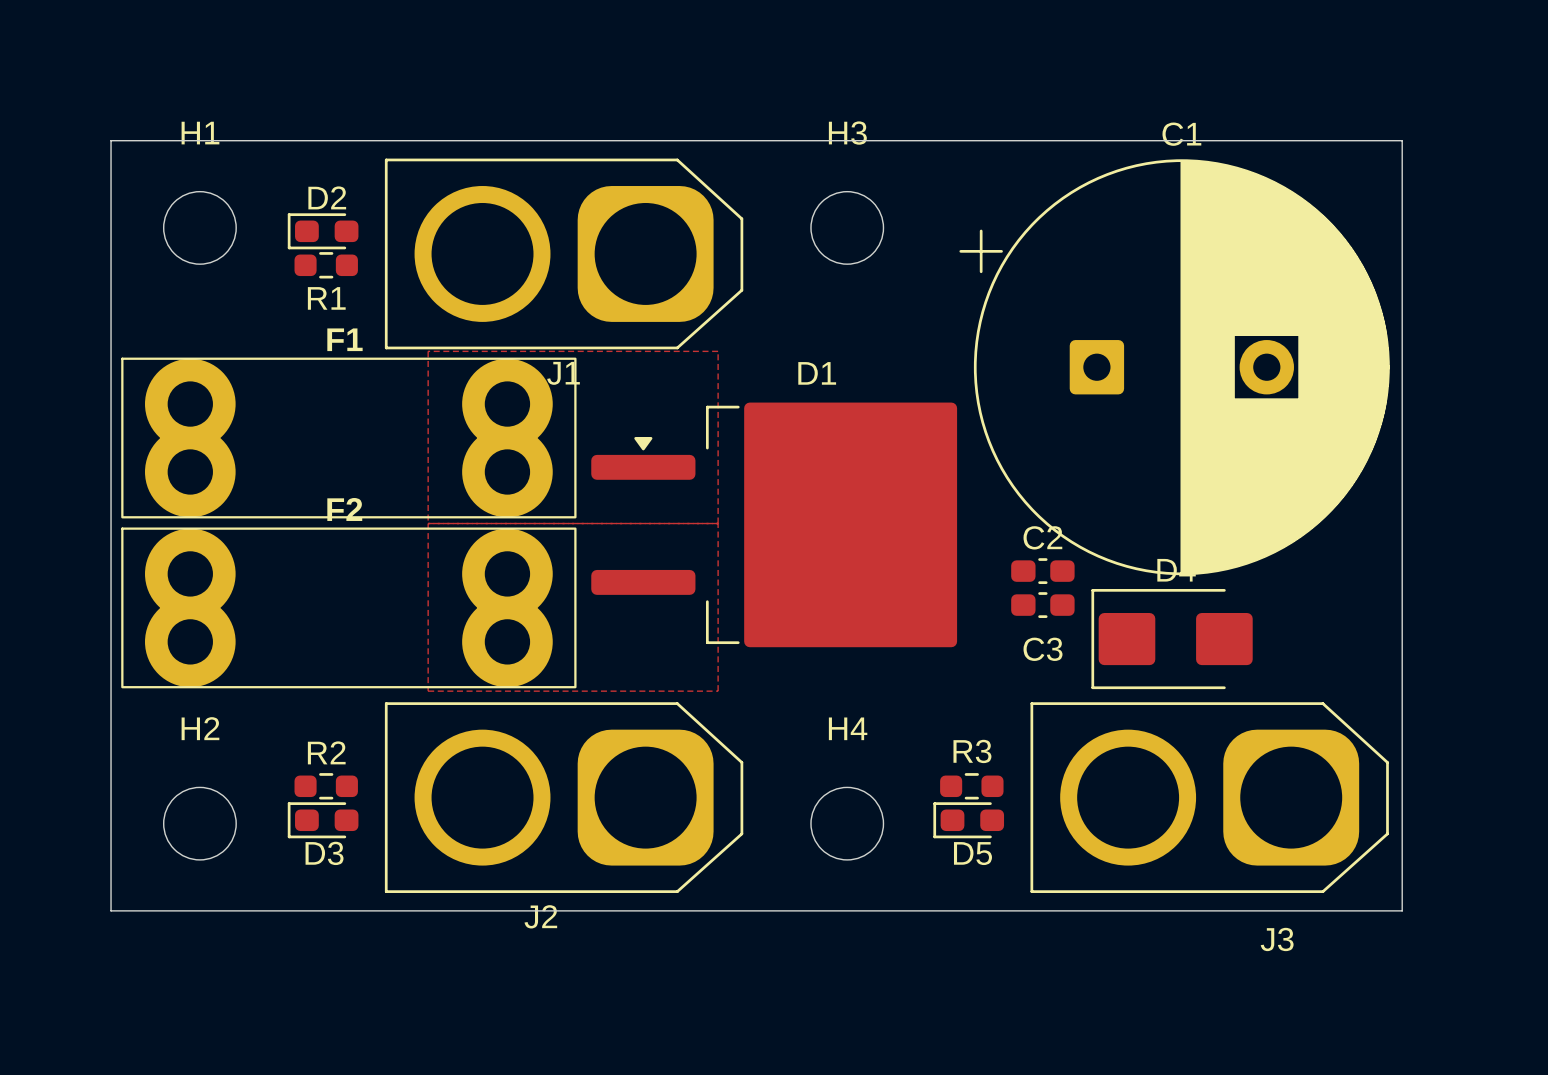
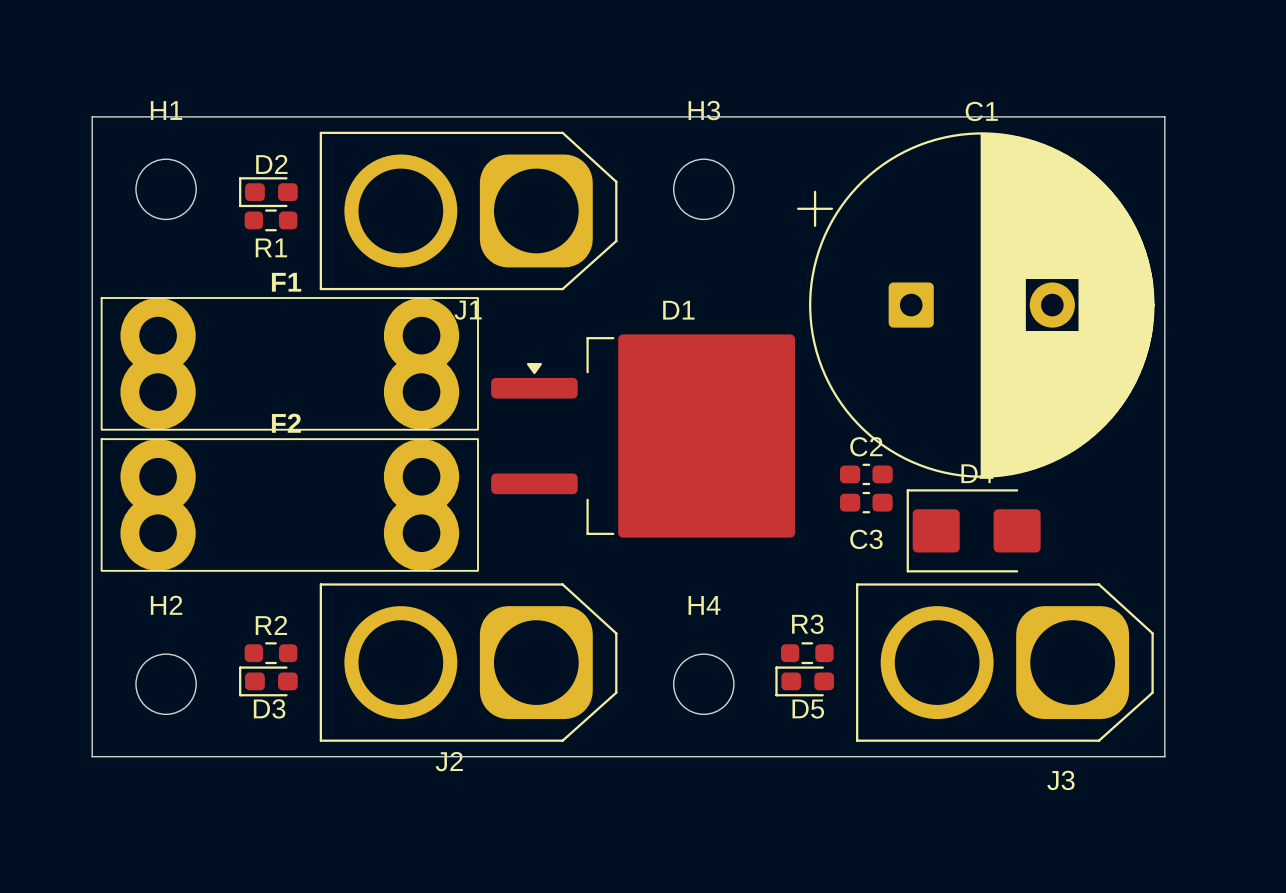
zone outline: (428, 351) (428, 691) (718, 691) (718, 351) (428, 351) -> none
zone outline: (428, 523) (718, 523) -> none

